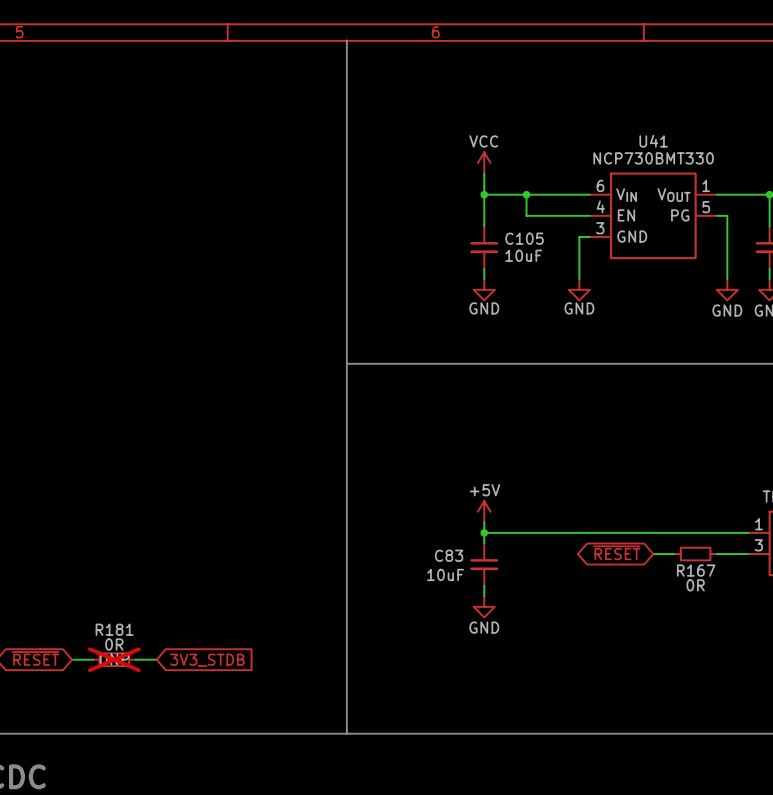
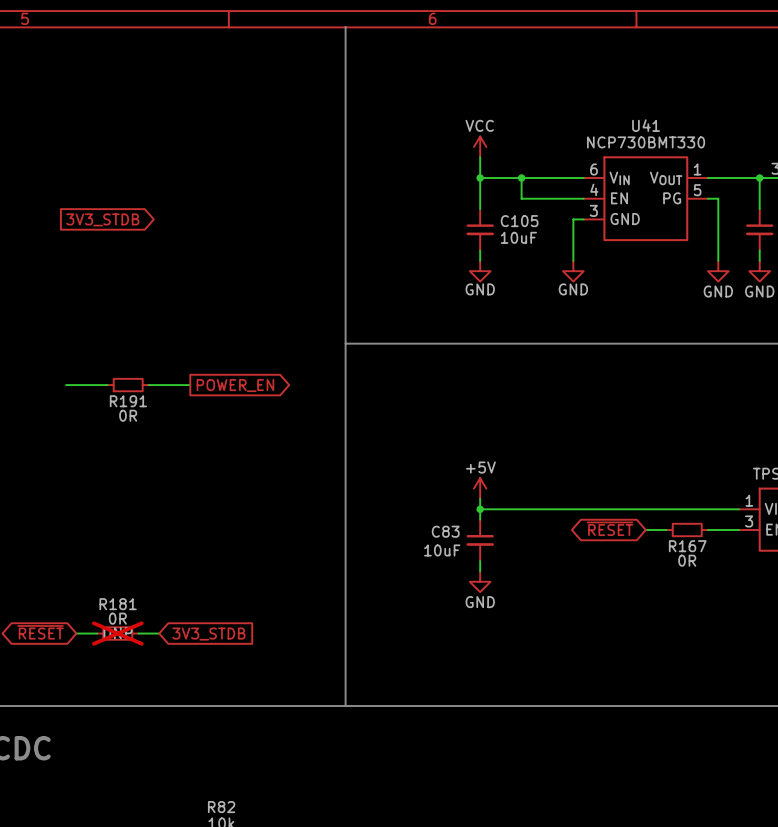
global label: none -> 3V3_STDB (102, 219)
wire: none -> (66, 385) (107, 385)
R191: none -> 0R (128, 385)
wire: none -> (148, 385) (190, 385)
global label: none -> POWER_EN (235, 385)

